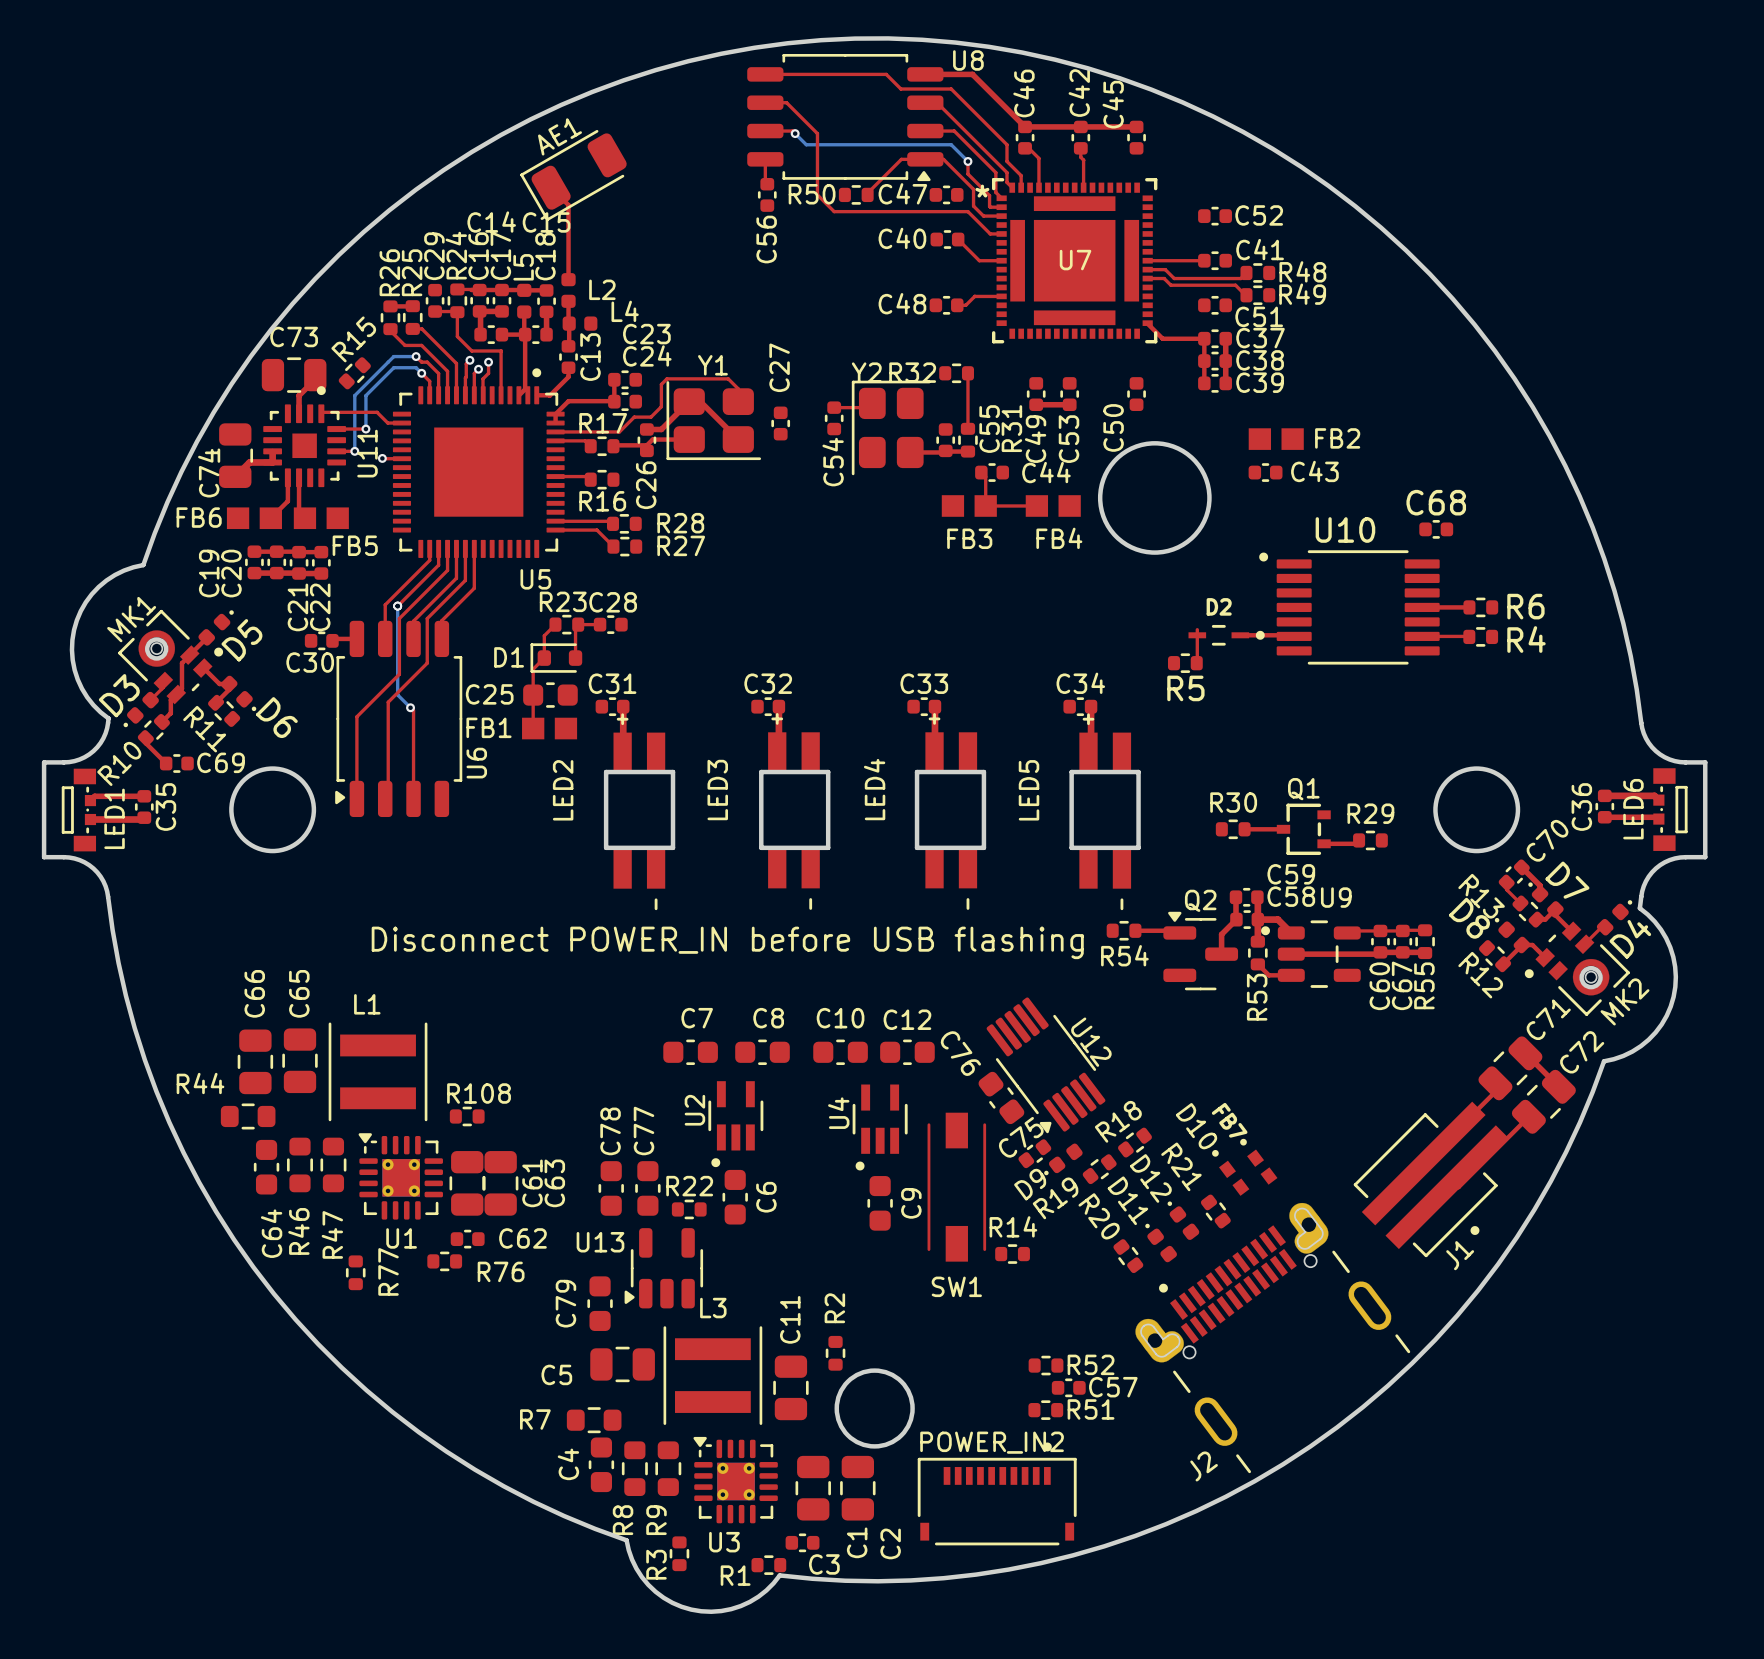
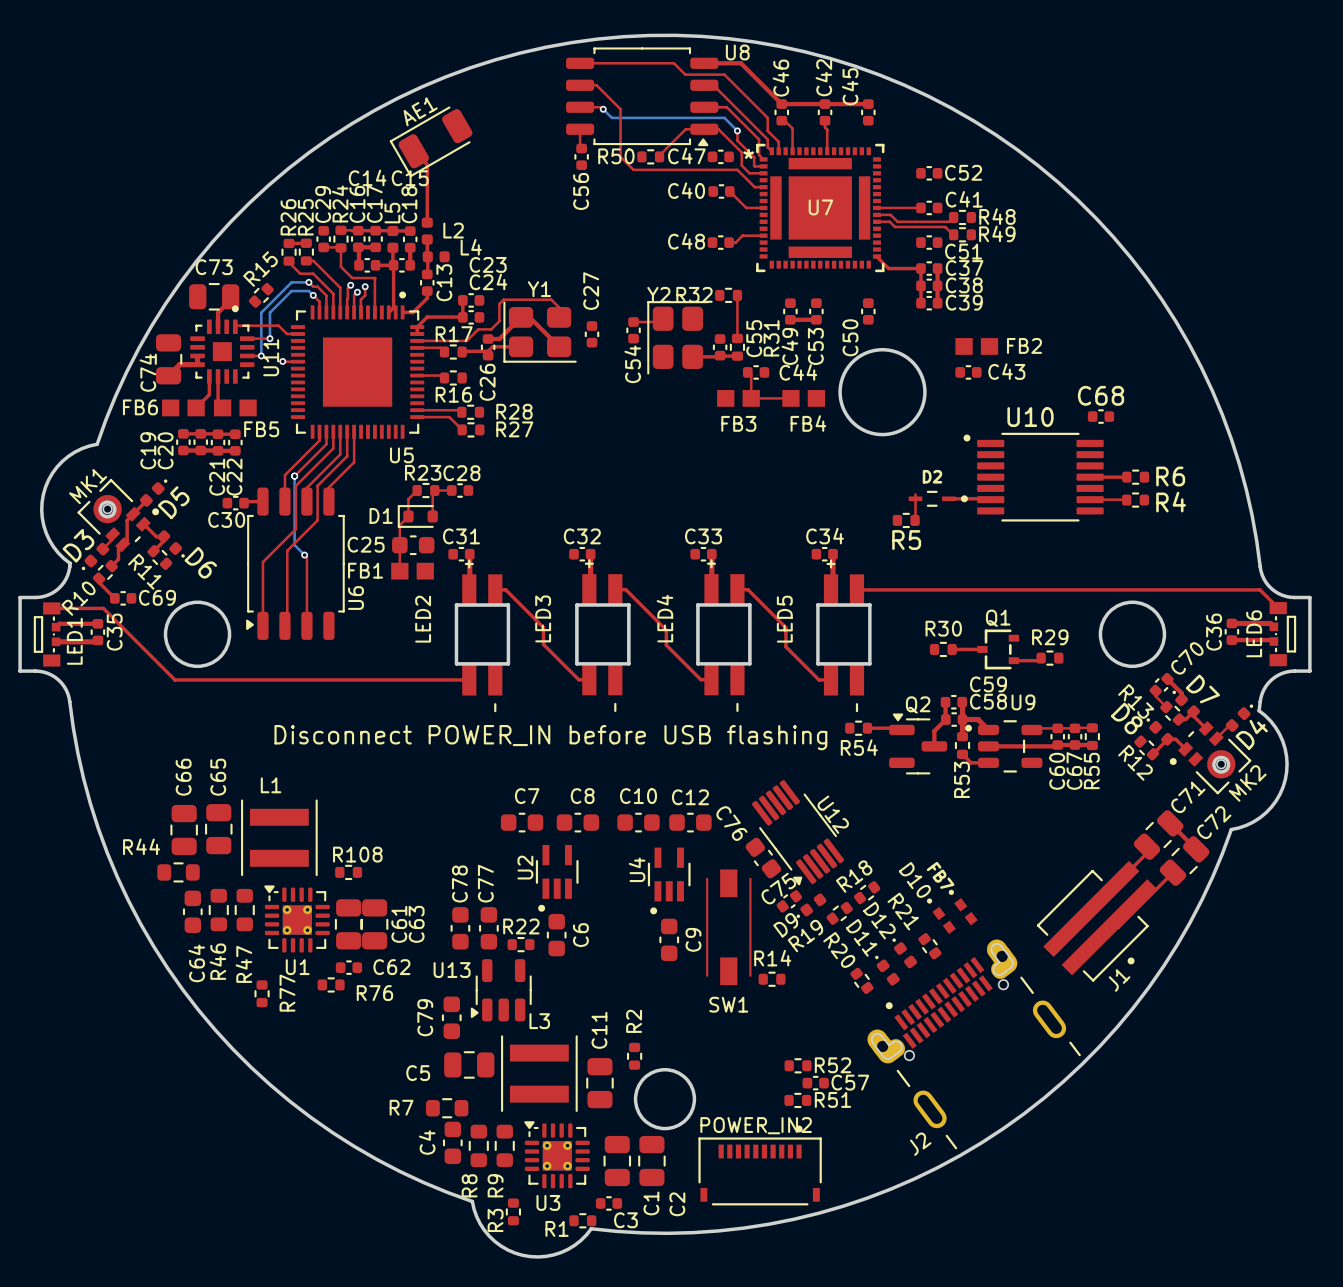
top track: none -> (495, 589) (505, 589) (543, 627) (543, 644) (578, 679) (589, 679)
top track: none -> (615, 589) (625, 589) (666, 630) (666, 645) (700, 679) (711, 679)
top track: none -> (737, 589) (747, 589) (785, 627) (785, 646) (819, 679) (831, 679)
top track: none -> (856, 589) (1260, 589) (1278, 608)
top track: none -> (51, 608) (103, 608) (174, 679) (469, 679)

